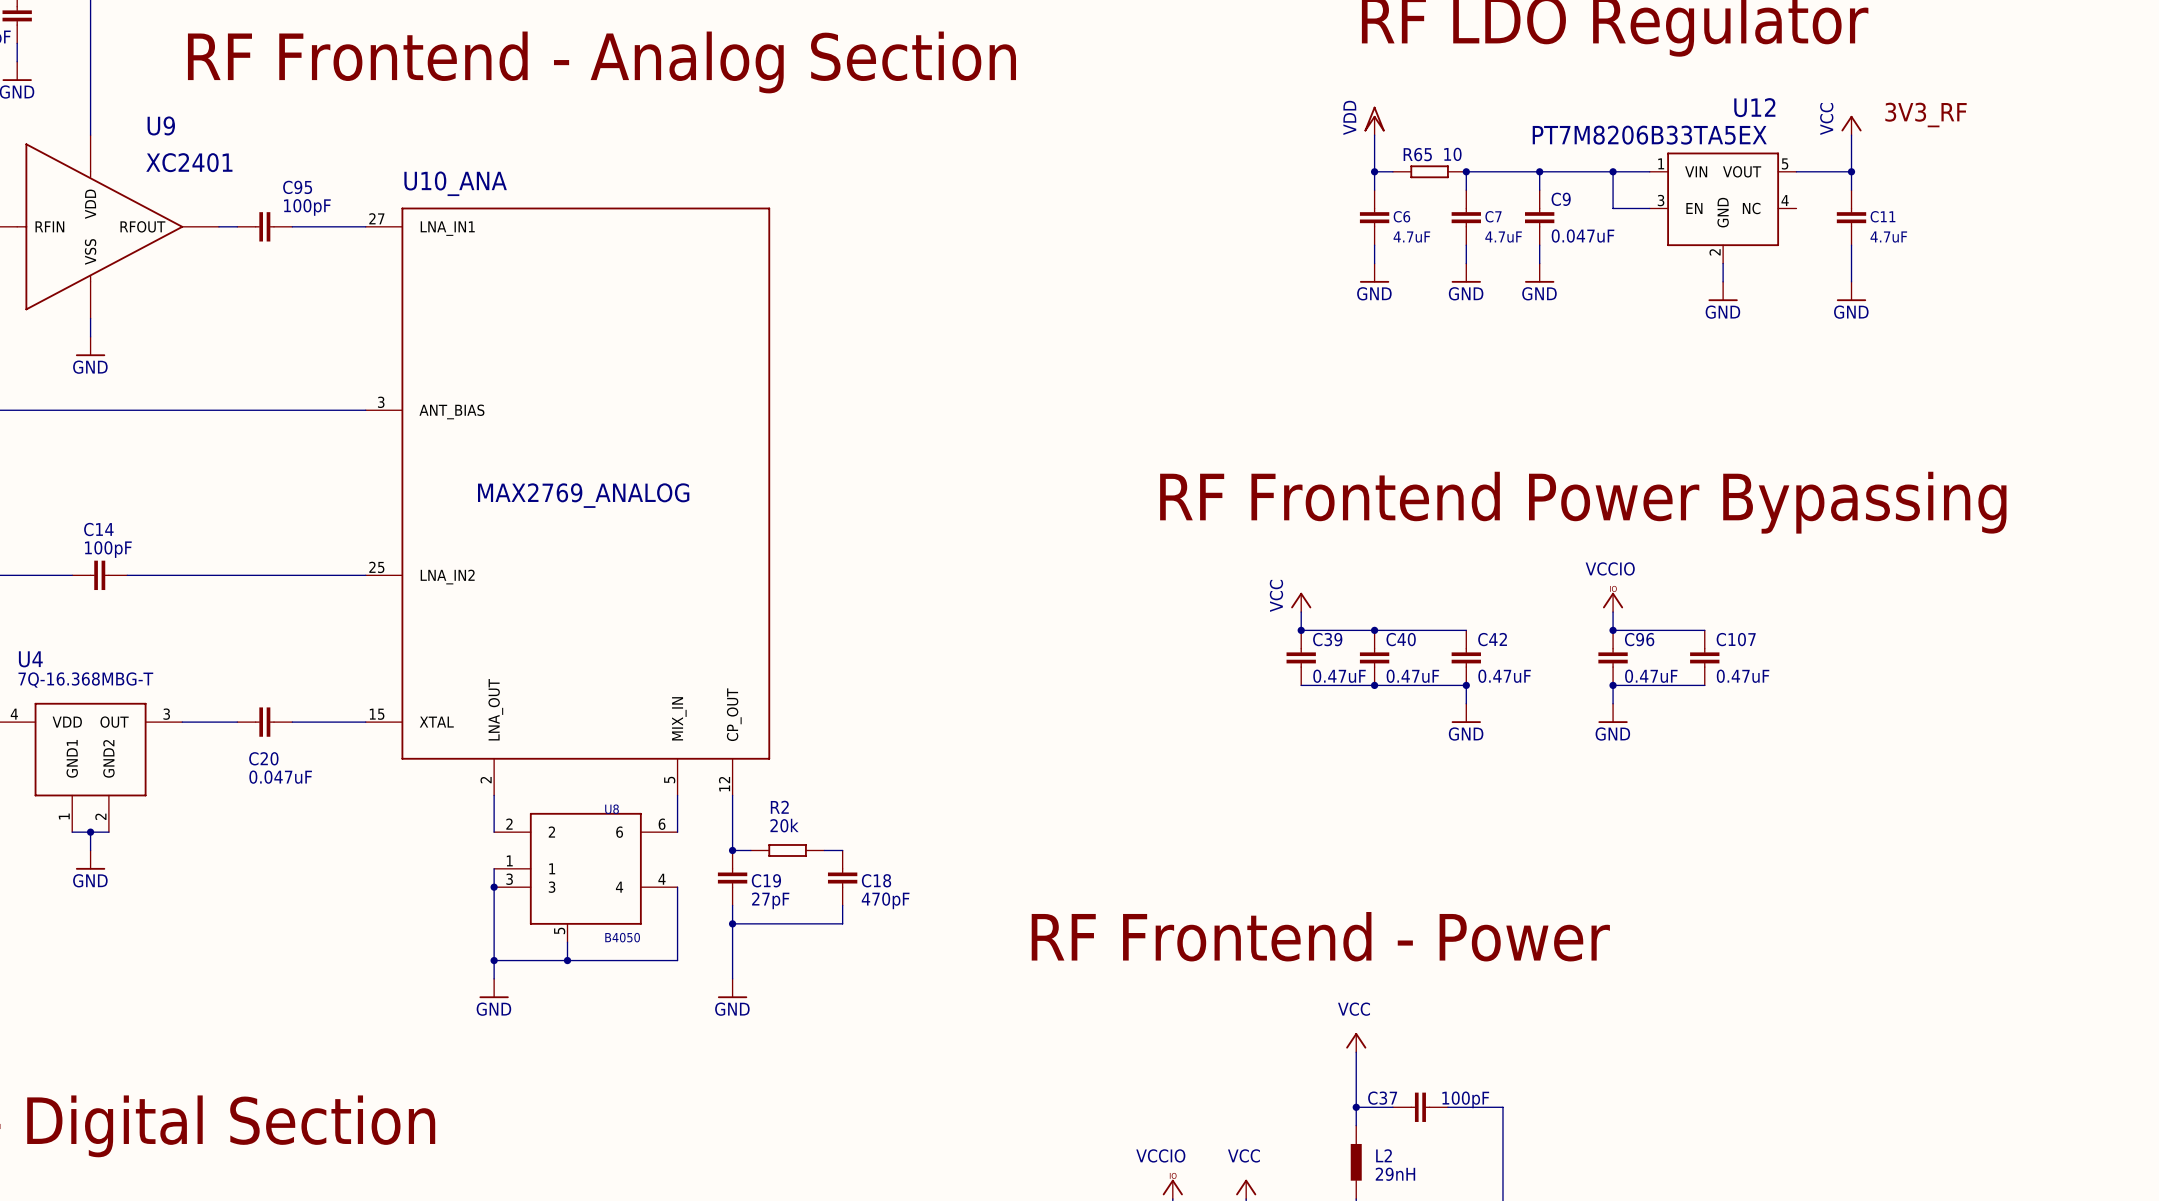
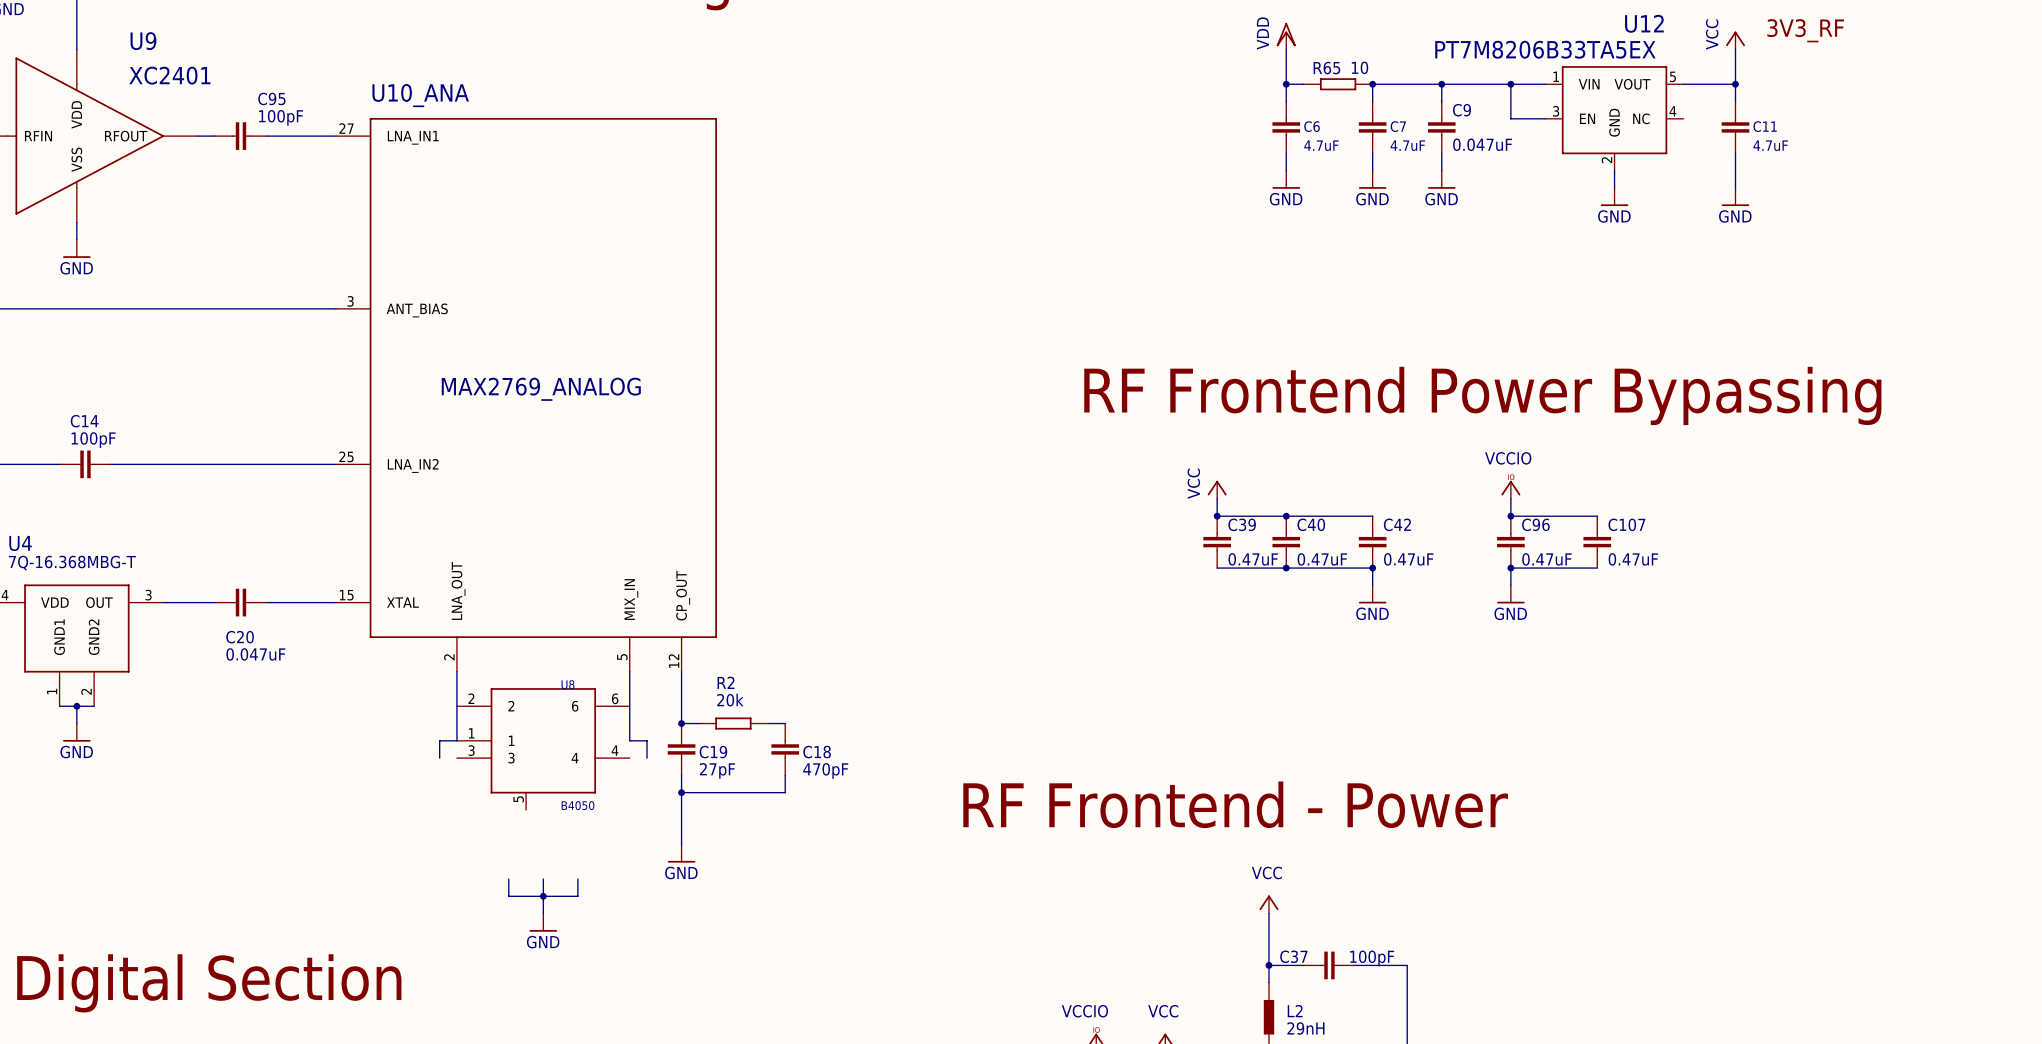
wire: none -> (456, 706) (456, 740) (439, 740) (439, 758)
wire: none -> (629, 706) (629, 740) (647, 740) (647, 758)
wire: (494, 868) (494, 978) -> none
junction: (494, 887) -> none
wire: (677, 887) (677, 960) (494, 960) -> none
wire: (567, 942) (567, 960) -> none
junction: (494, 960) -> none
junction: (567, 960) -> none
power symbol position: GND (494, 988) -> GND (543, 922)
wire: none -> (508, 879) (508, 896) (577, 896) (577, 879)
wire: none -> (543, 879) (543, 913)
junction: none -> (543, 896)

